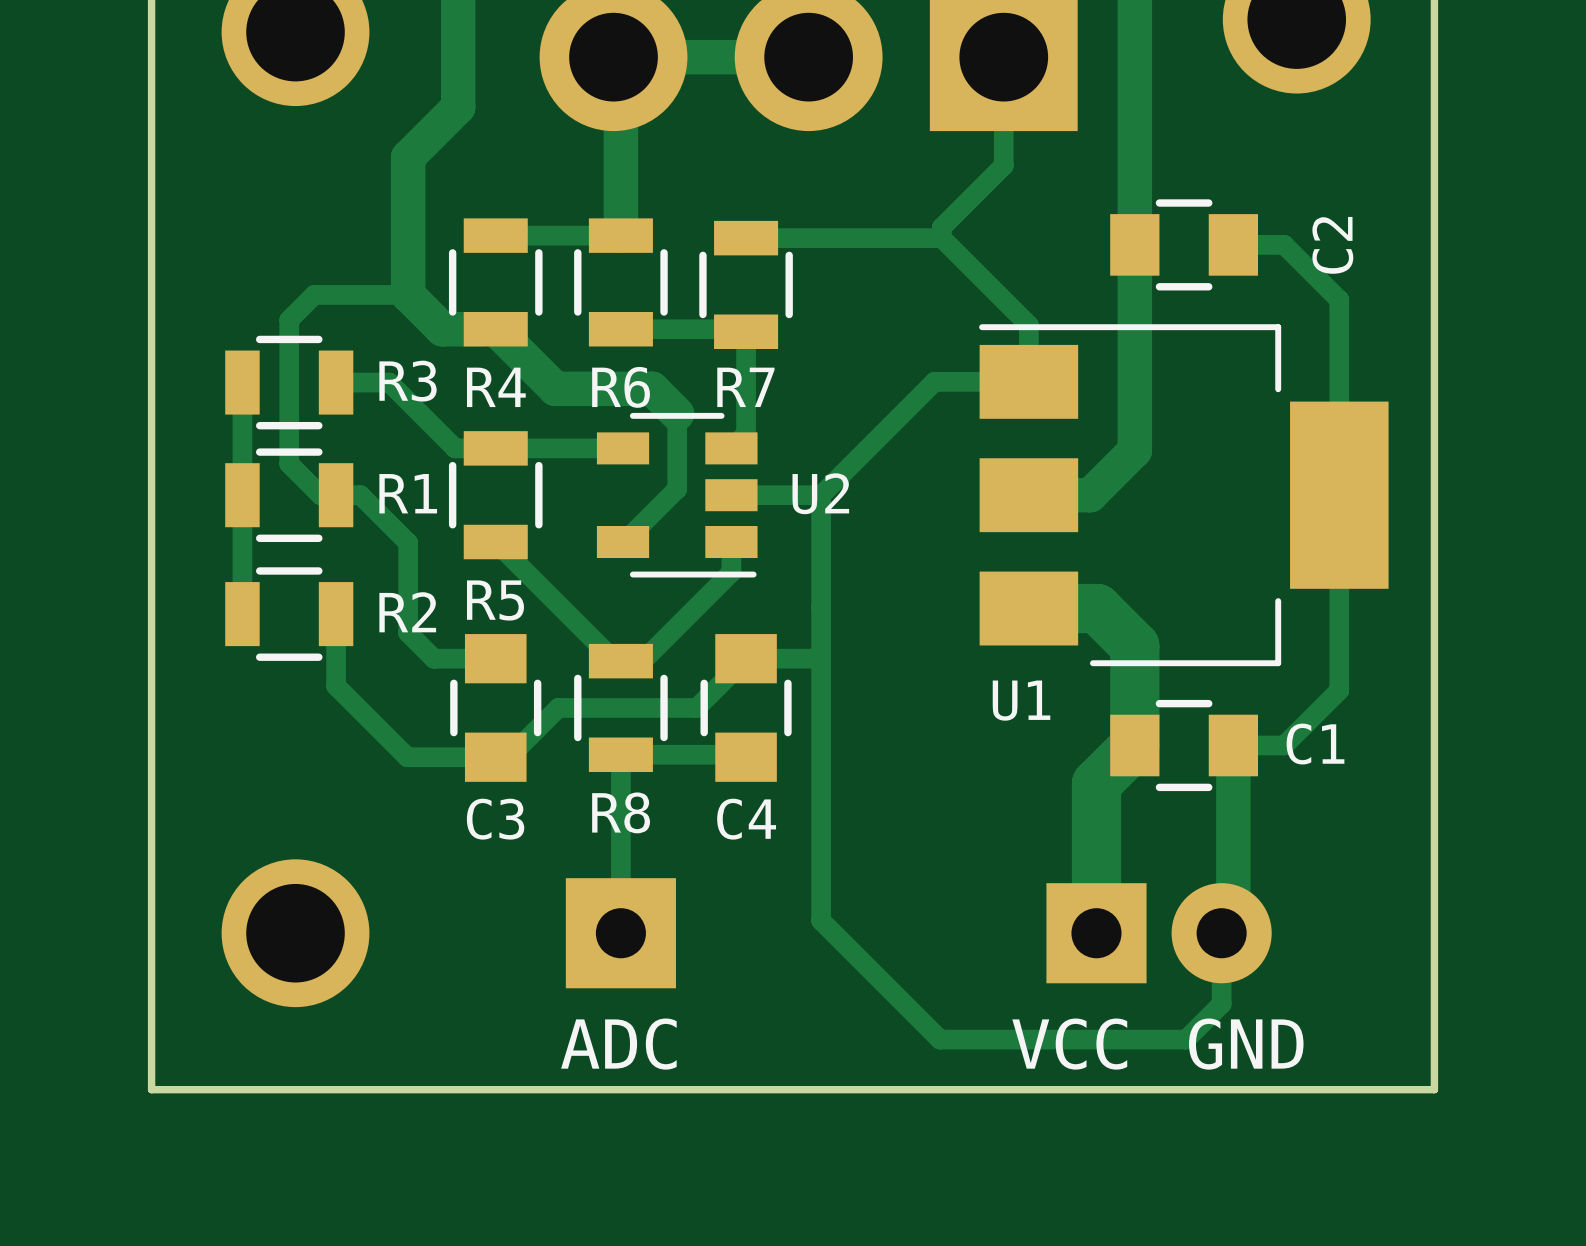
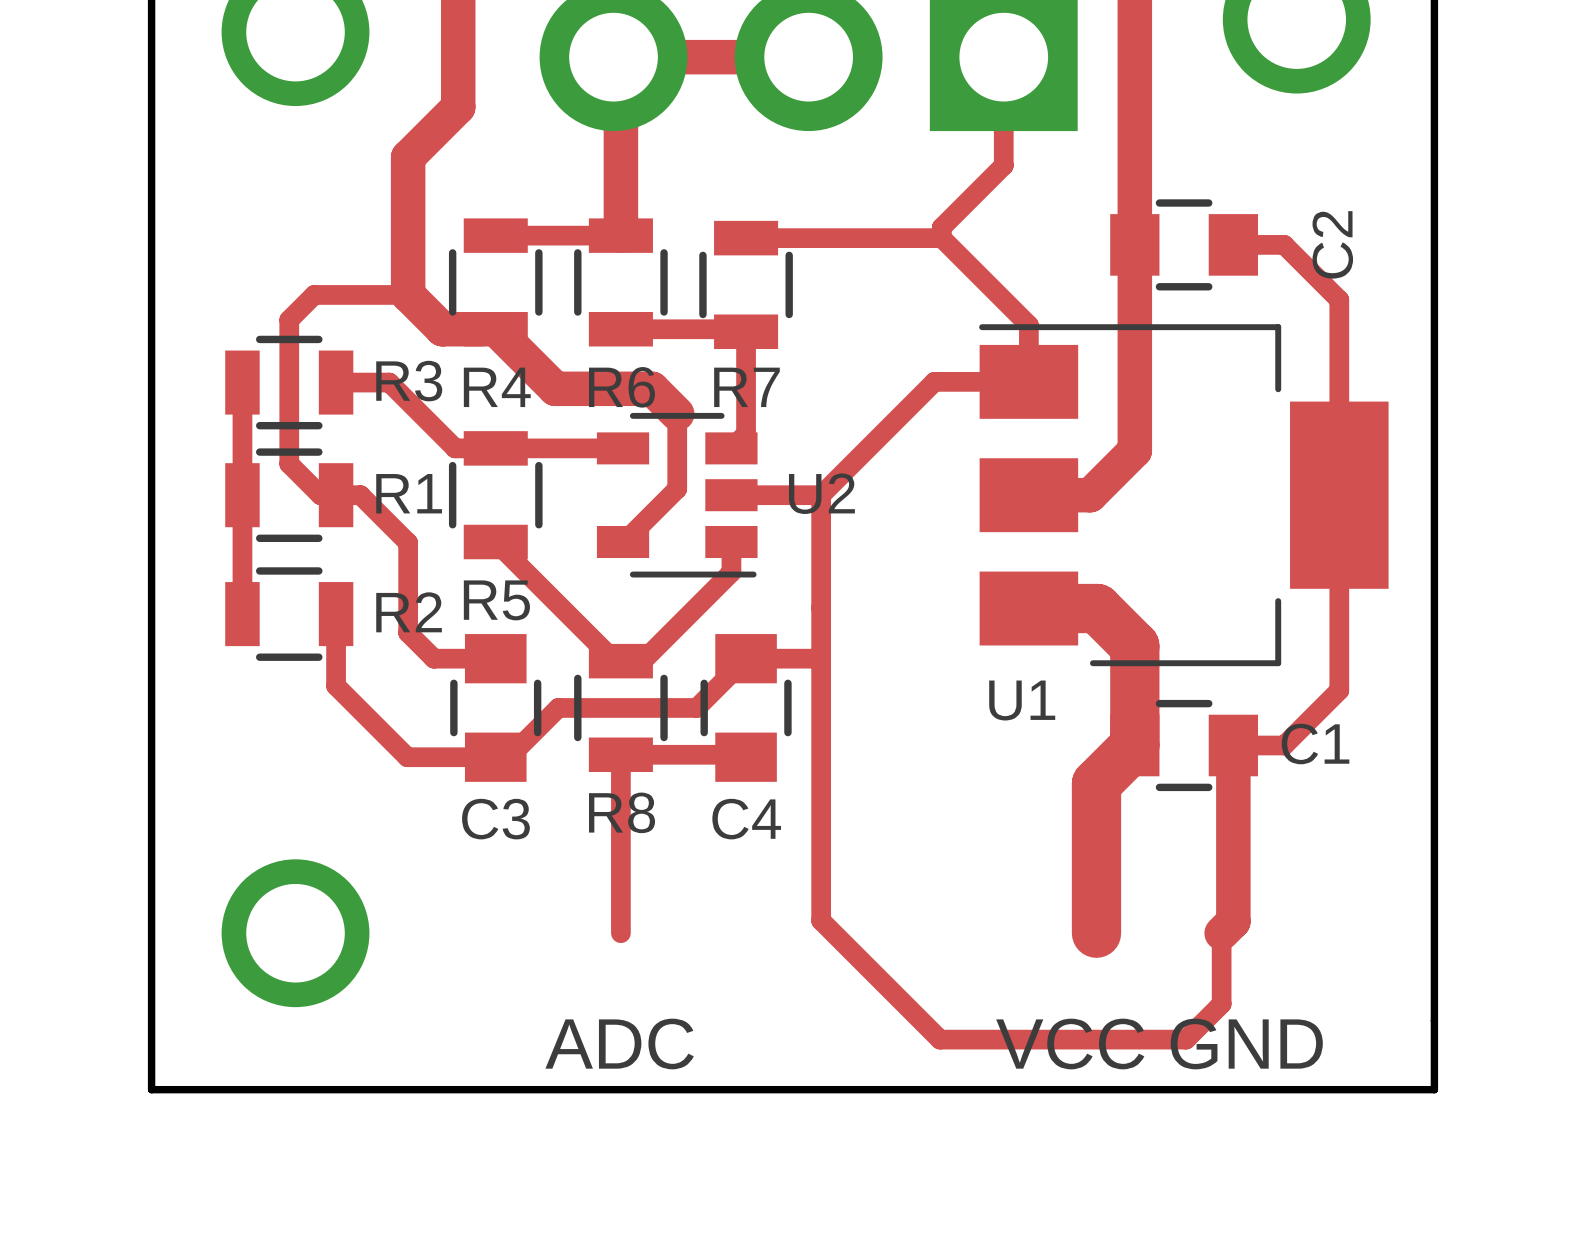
part: (620, 933) -> none
part: (1159, 933) -> none

